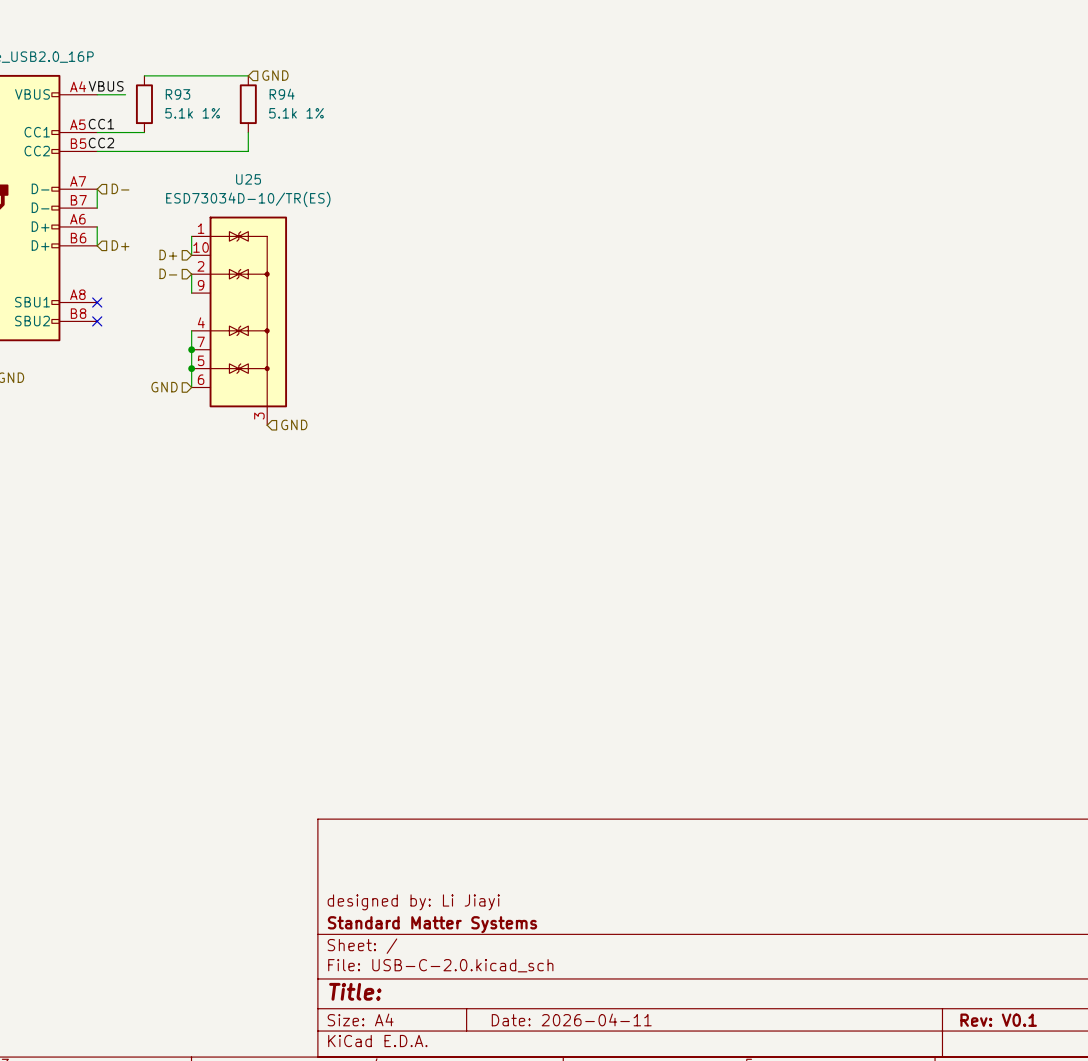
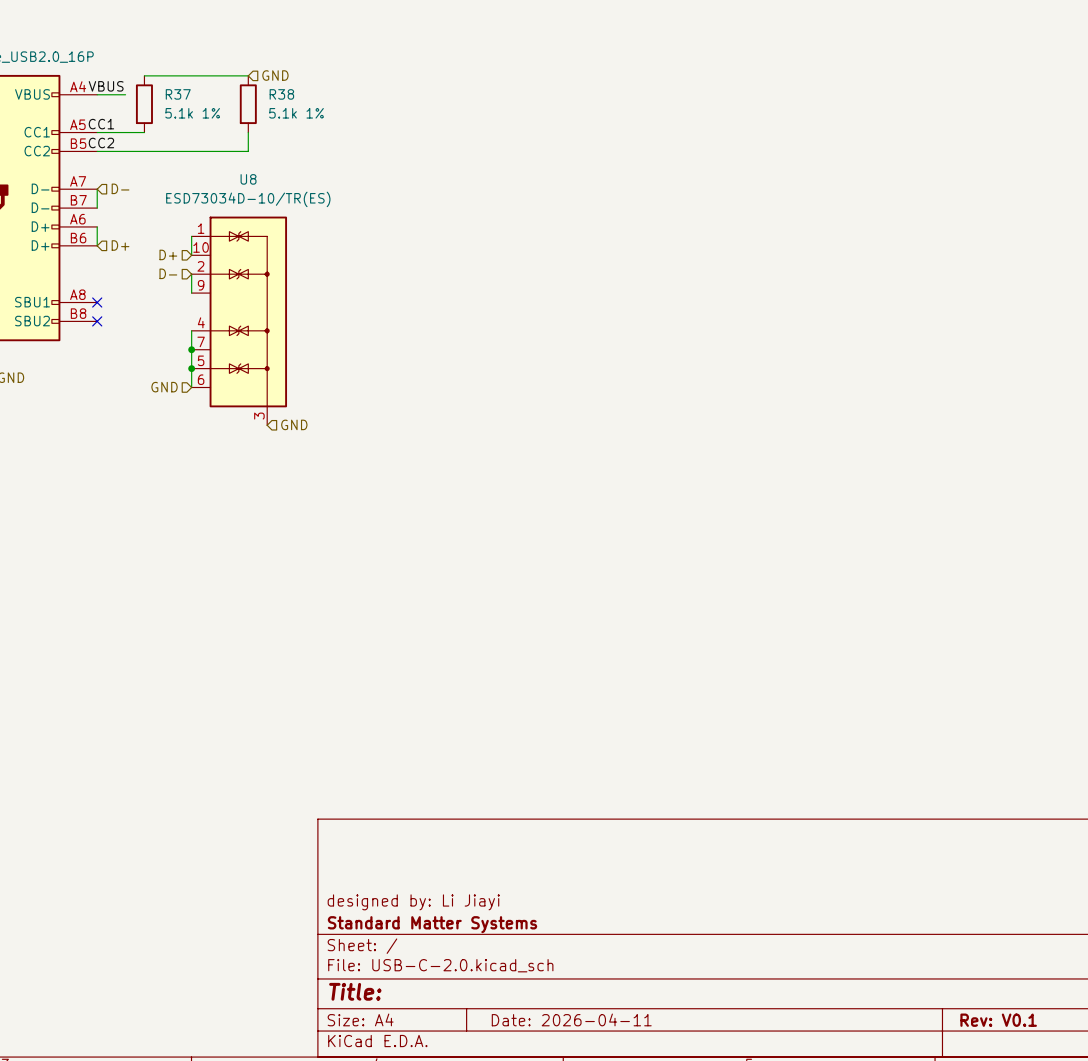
R93 name: R93 (178, 94) -> R37 (178, 94)
R94 name: R94 (282, 94) -> R38 (281, 94)
U25 name: U25 (248, 179) -> U8 (248, 179)

